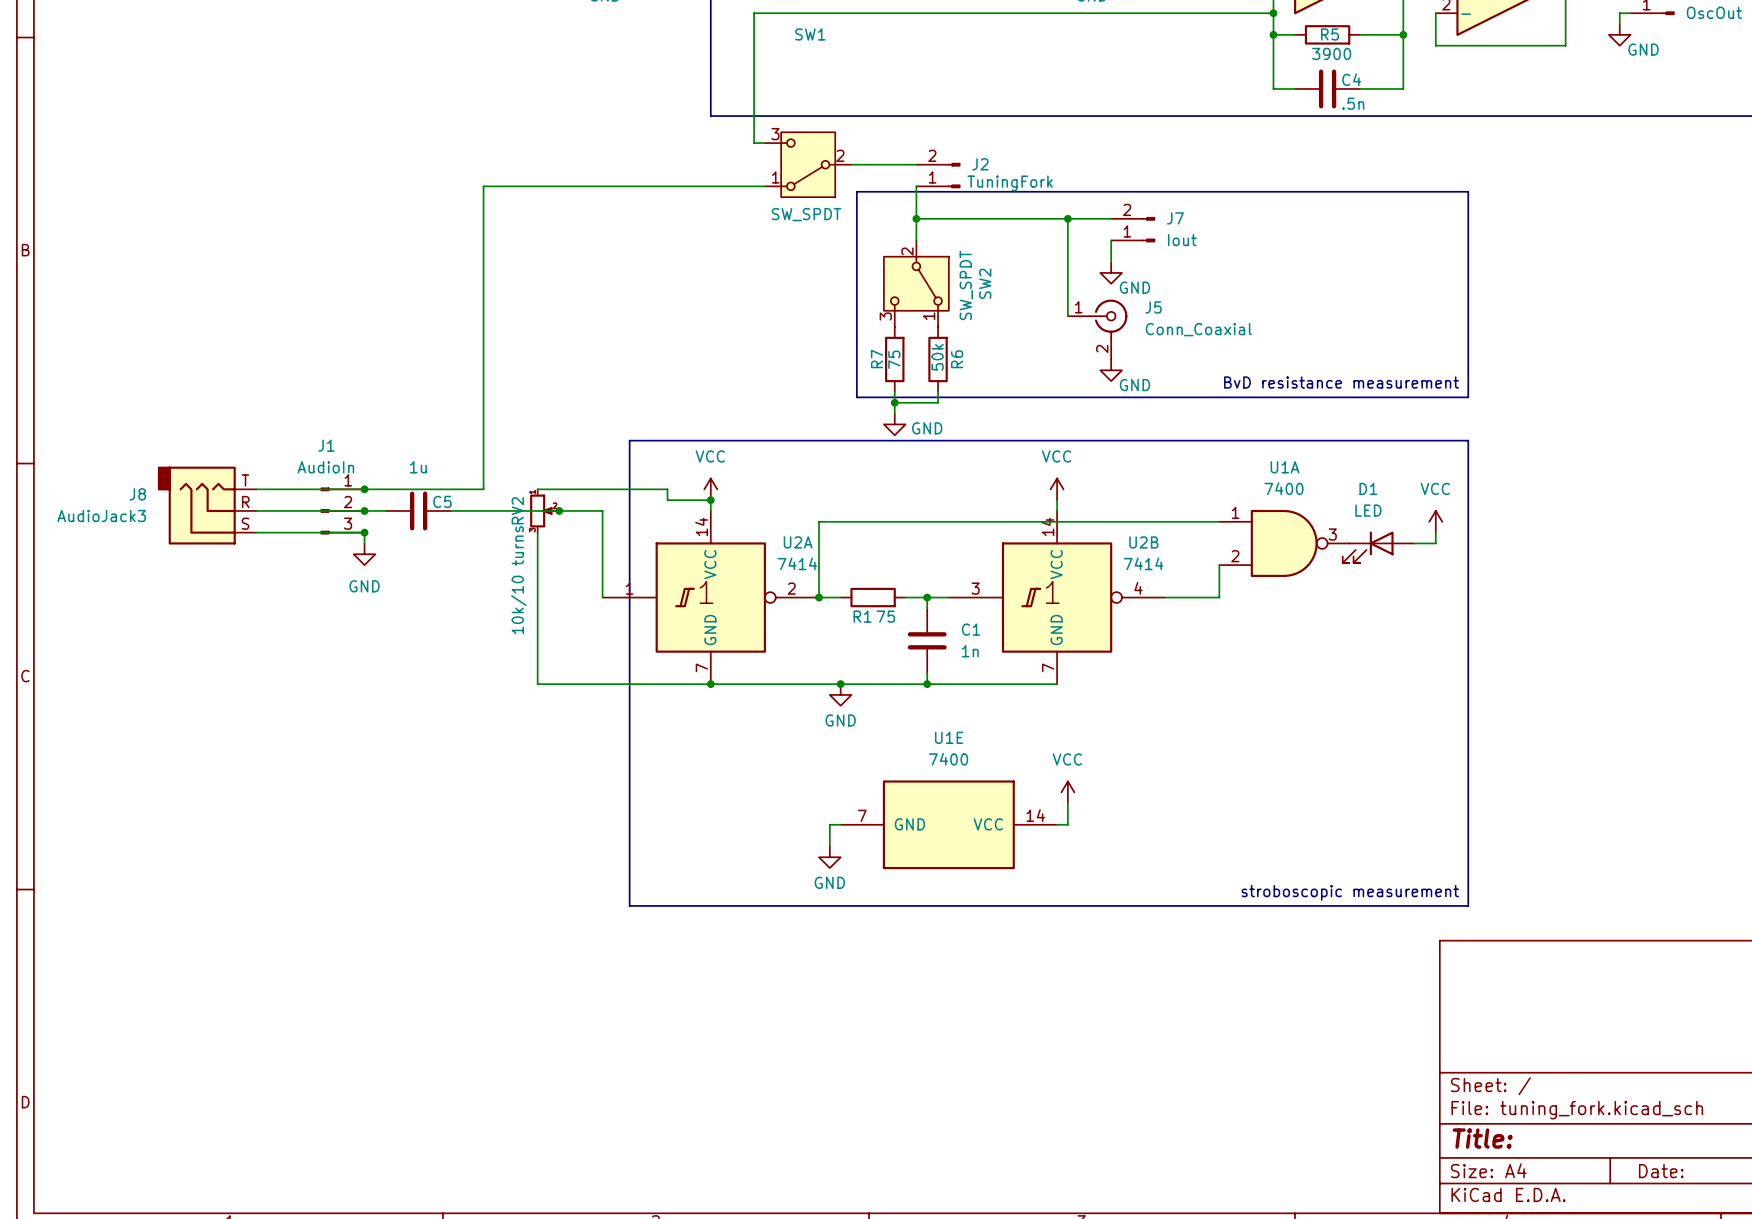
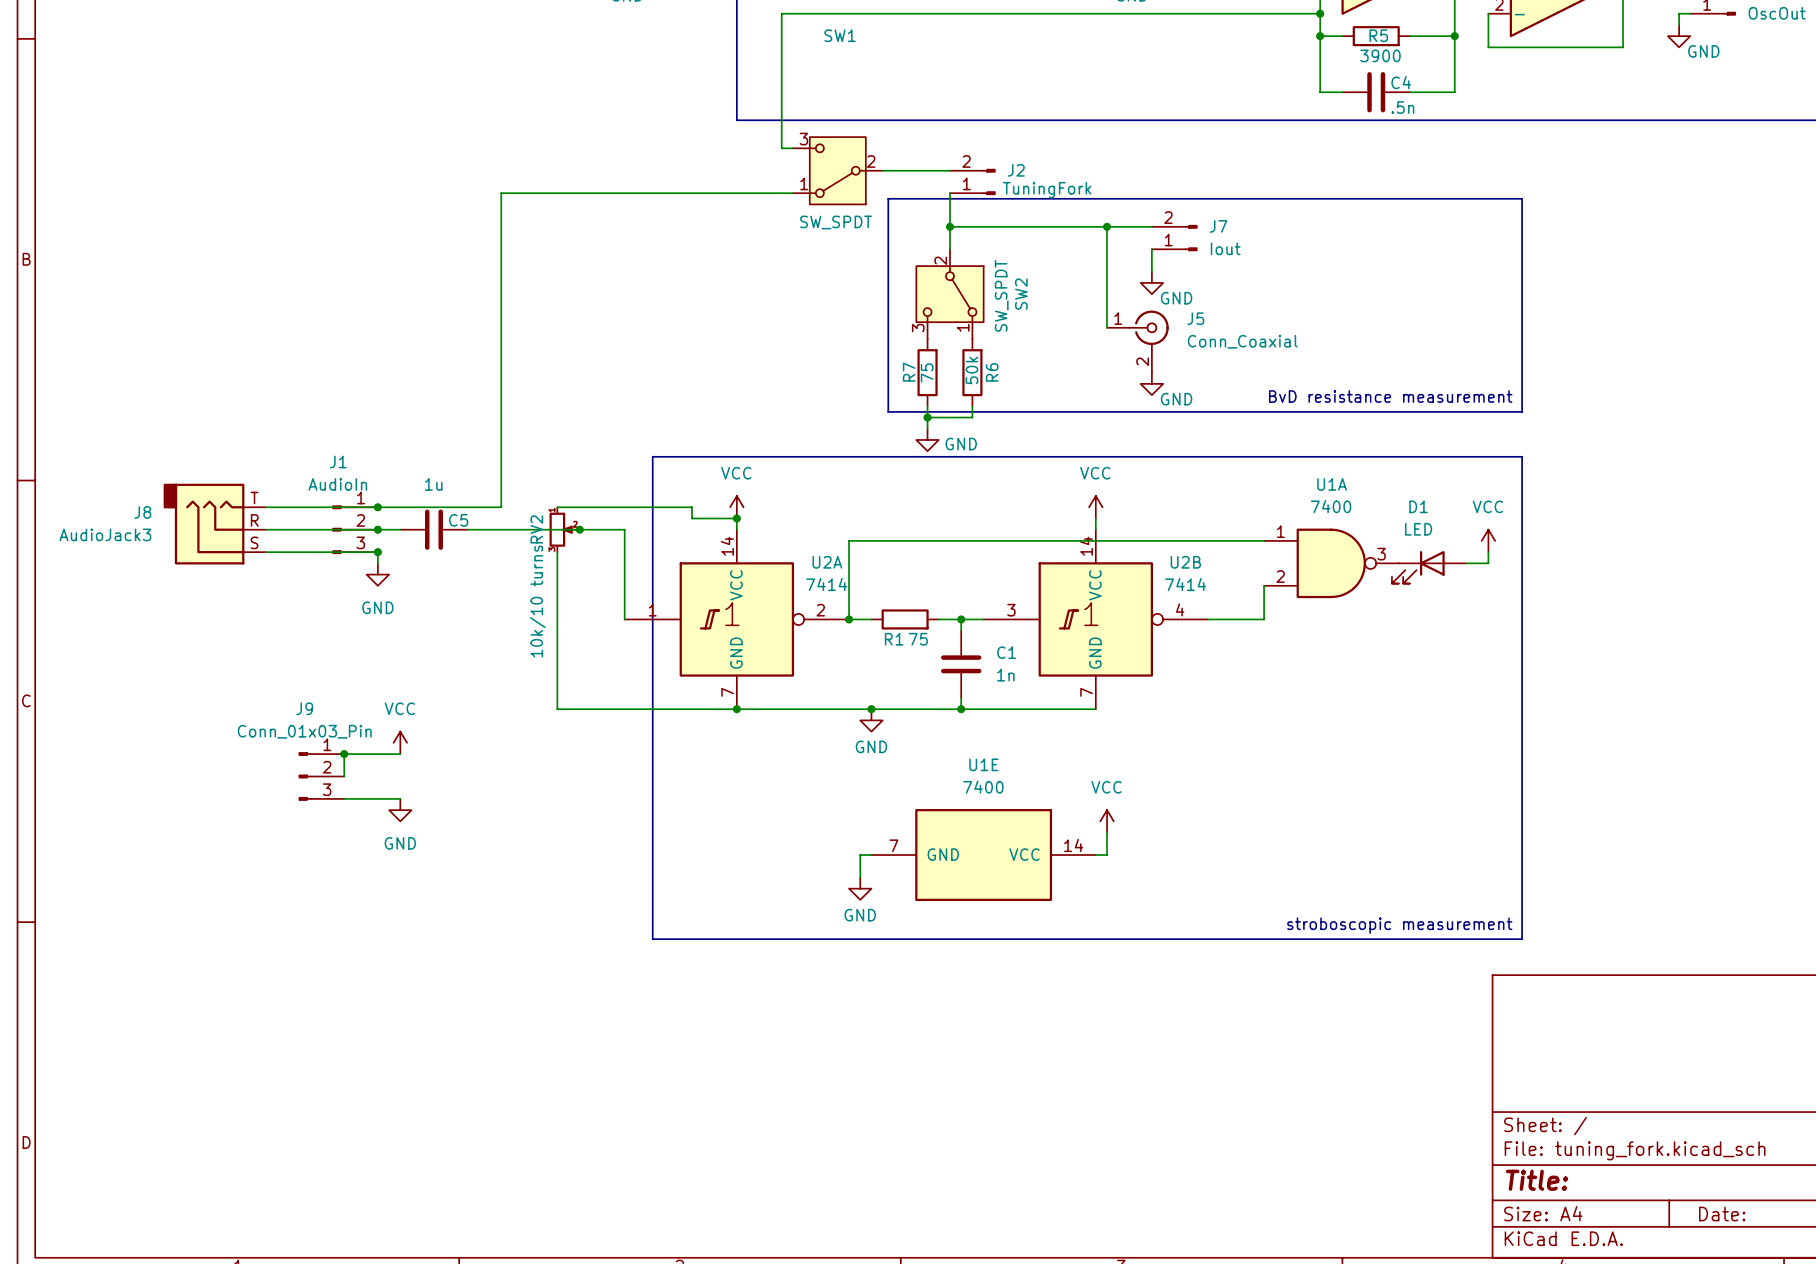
power symbol: none -> VCC (400, 742)
junction: none -> (344, 754)
wire: none -> (400, 754) (344, 754) (344, 776)
J9: none -> Conn_01x03_Pin (321, 776)
wire: none -> (344, 798) (400, 798)
power symbol: none -> GND (400, 810)

